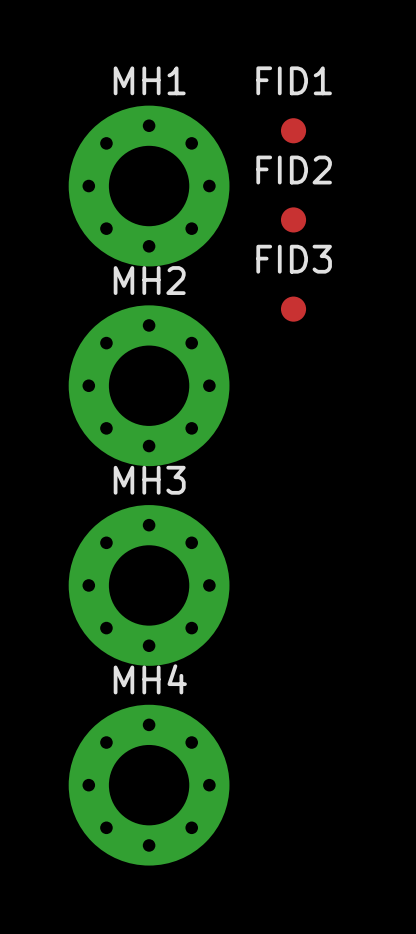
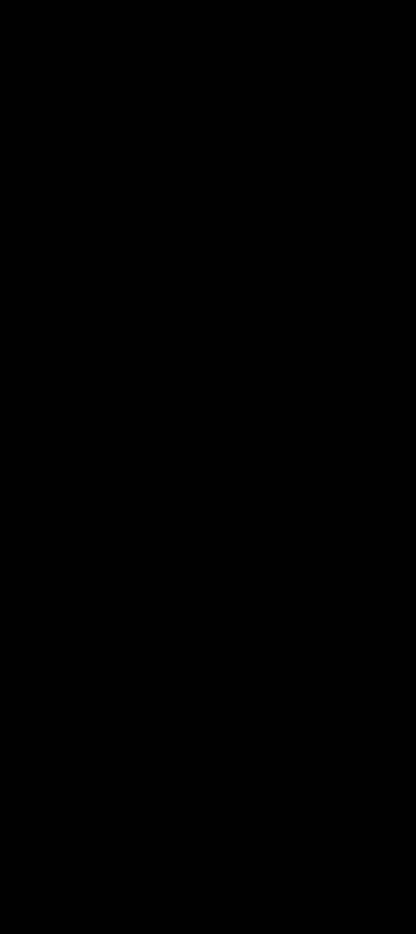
FID1: (293, 130) -> none
MH1: (149, 186) -> none
FID2: (293, 219) -> none
FID3: (293, 309) -> none
MH2: (149, 385) -> none
MH3: (149, 585) -> none
MH4: (149, 785) -> none

